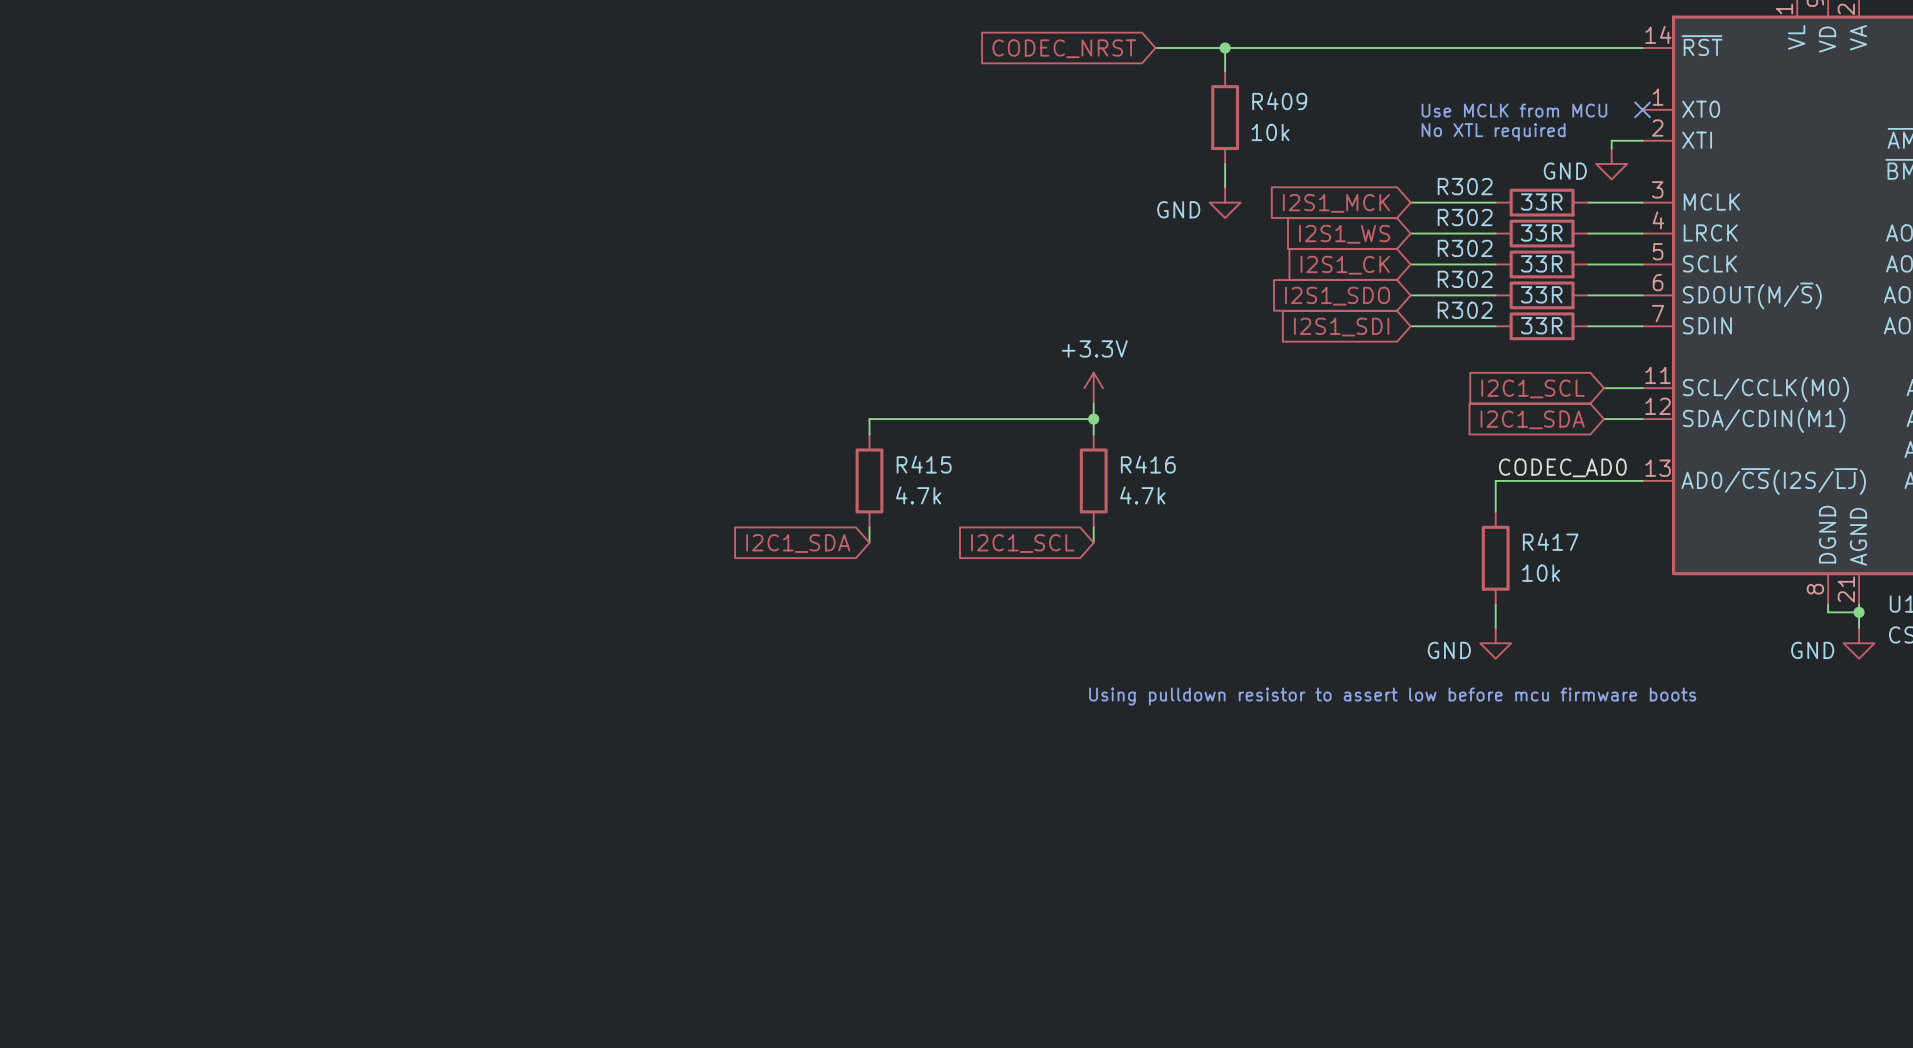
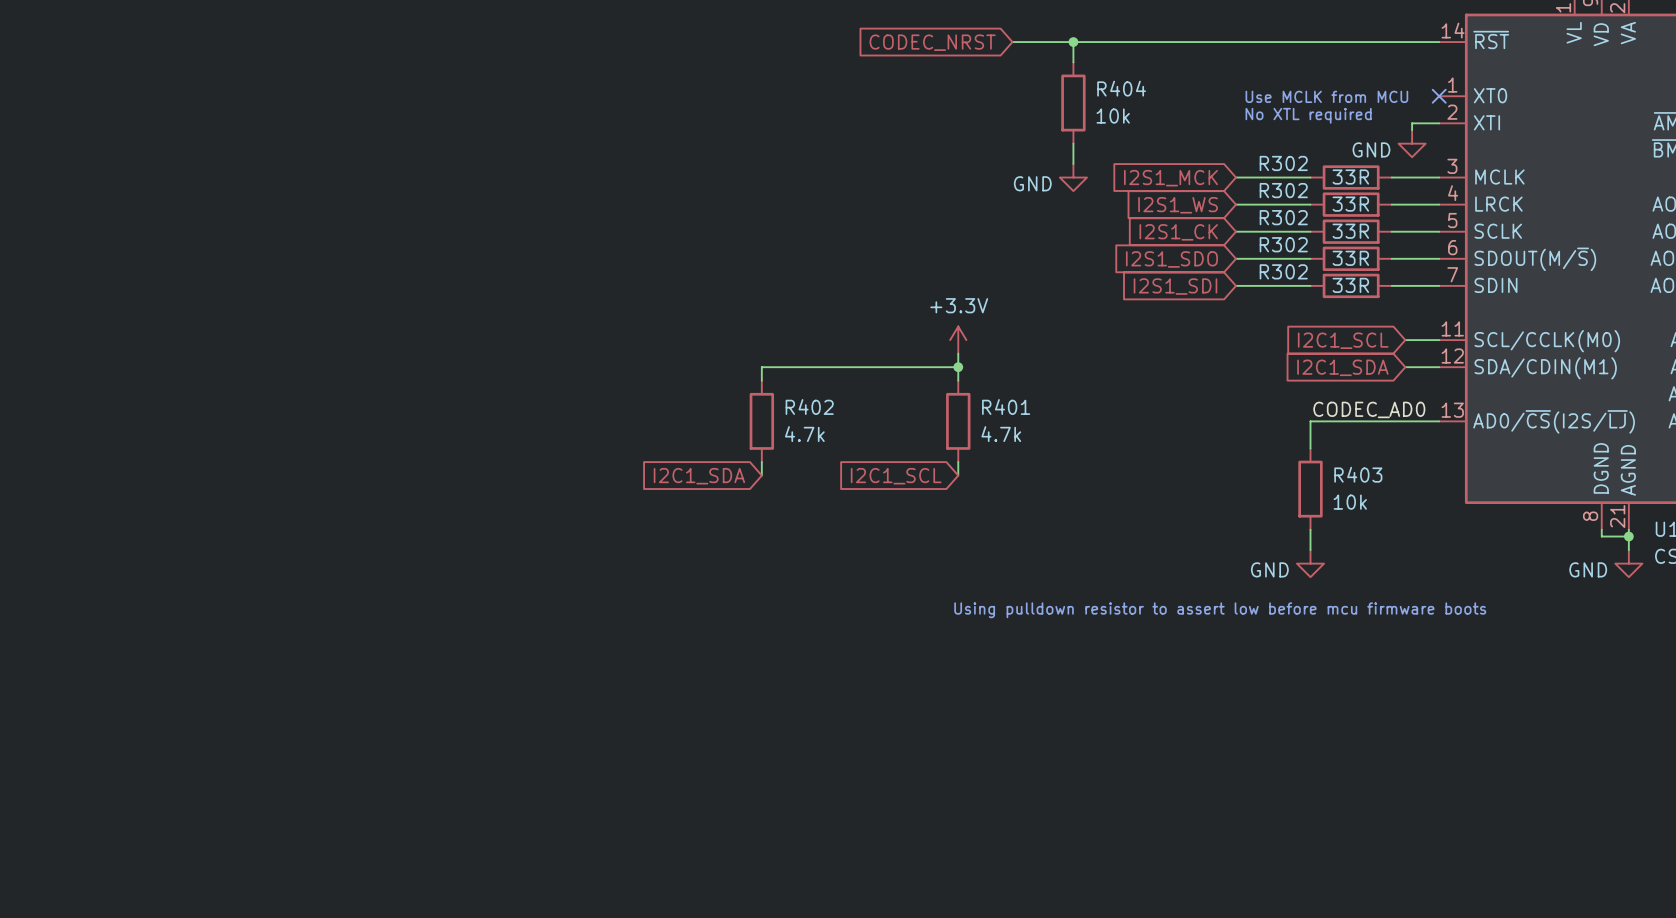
R409 name: R409 (1279, 101) -> R404 (1121, 88)
R415 name: R415 (924, 464) -> R402 (809, 407)
R416 name: R416 (1148, 464) -> R401 (1006, 407)
R417 name: R417 (1550, 541) -> R403 (1358, 474)

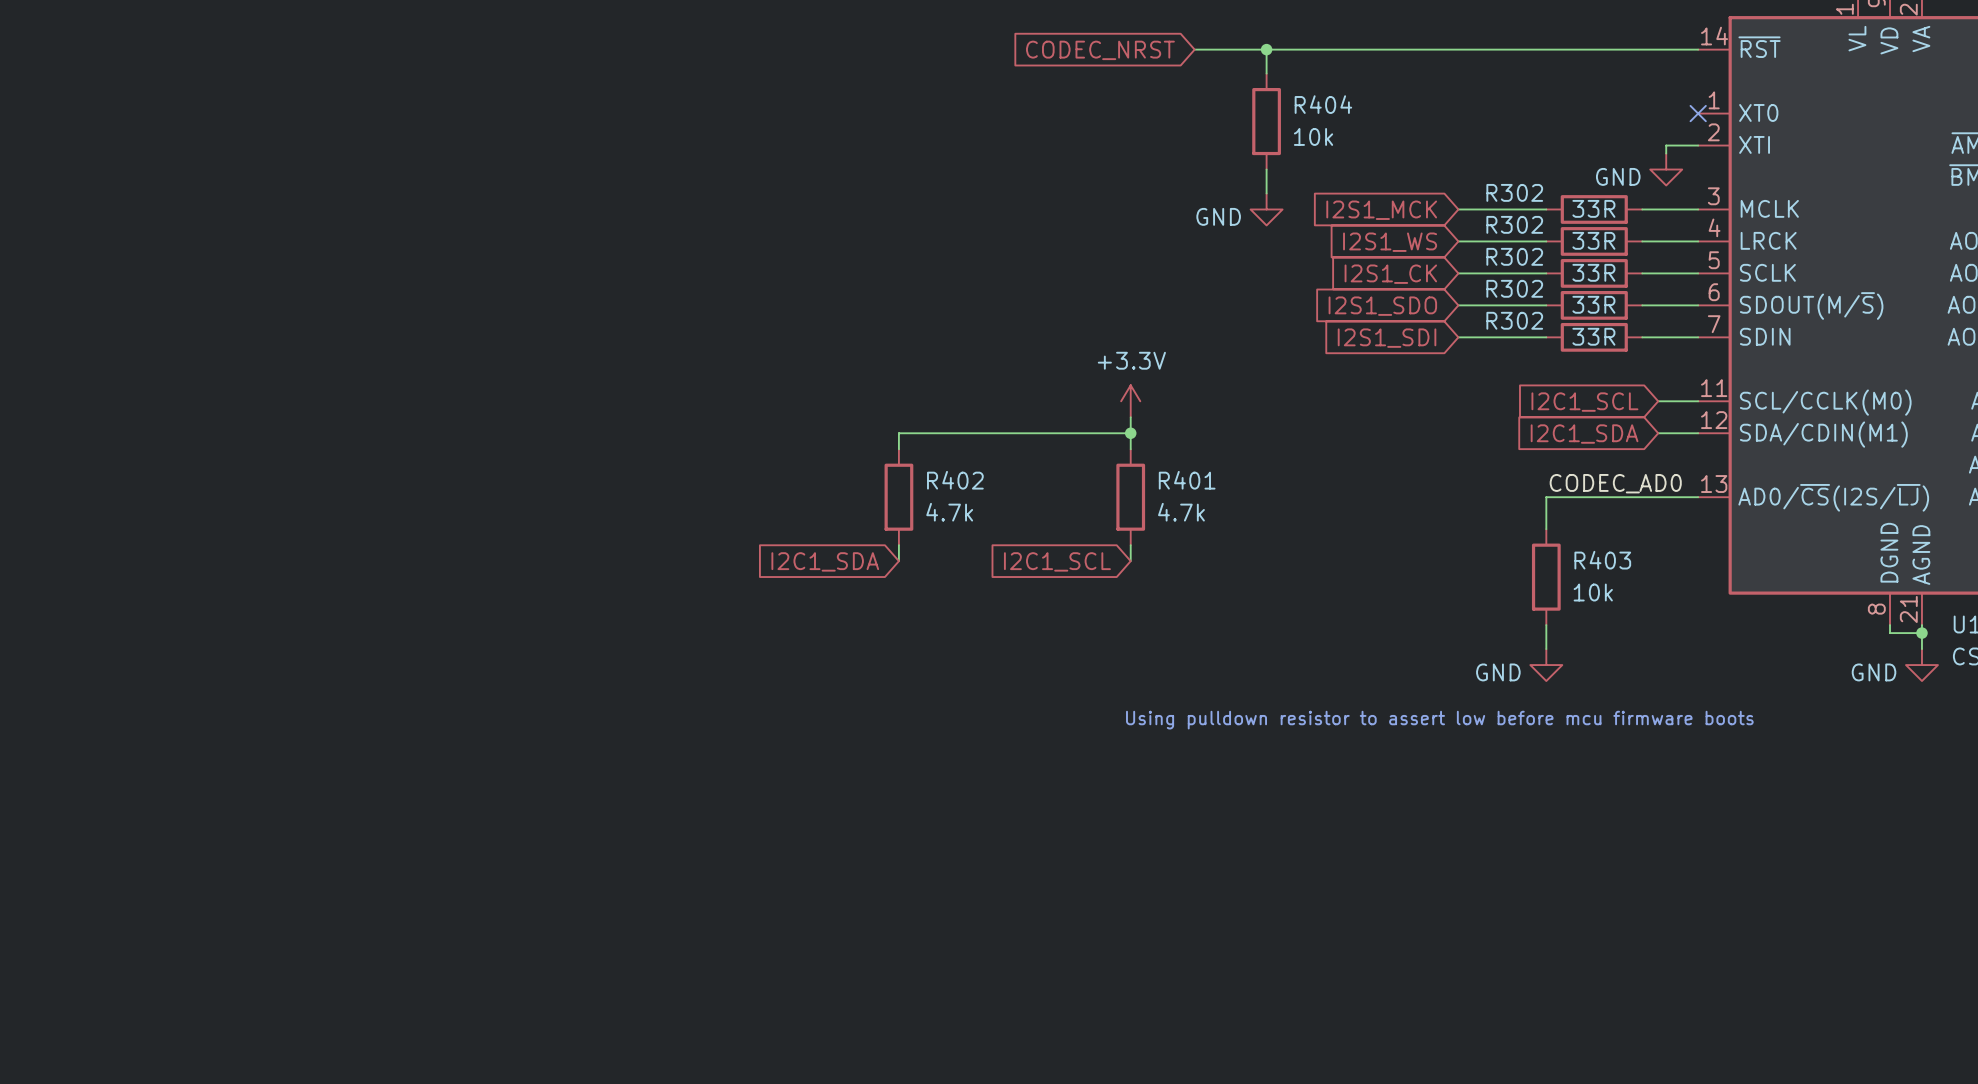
text: Use MCLK from MCU (1326, 96) -> none
text: No XTL required (1308, 115) -> none

